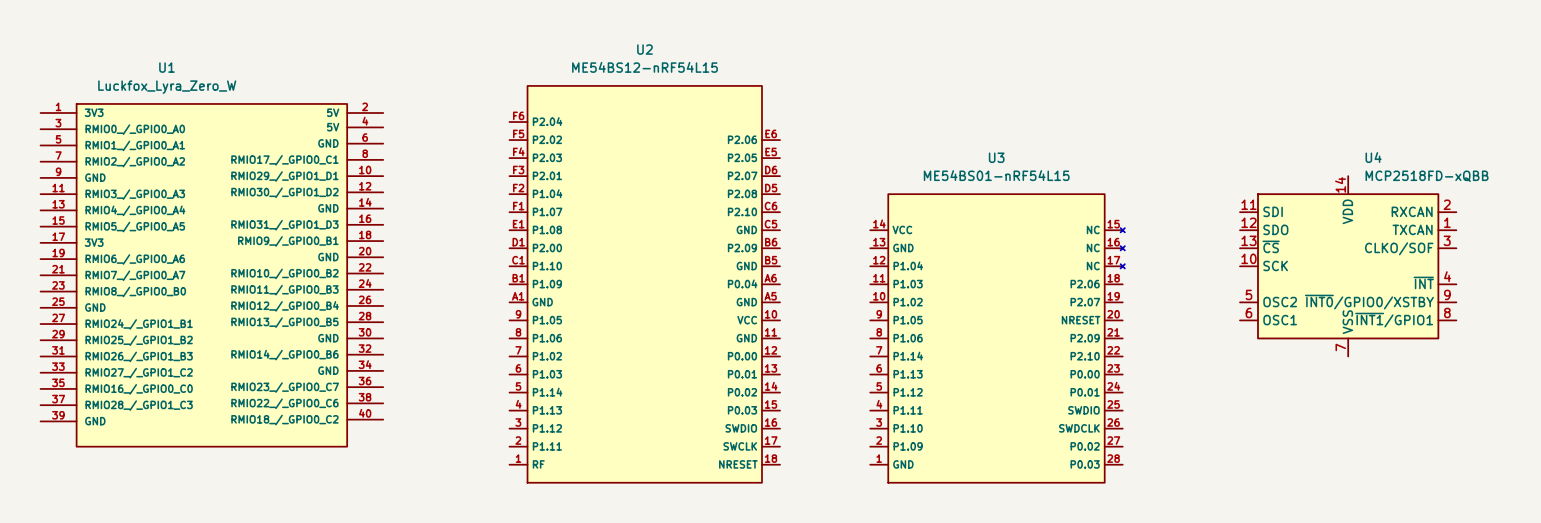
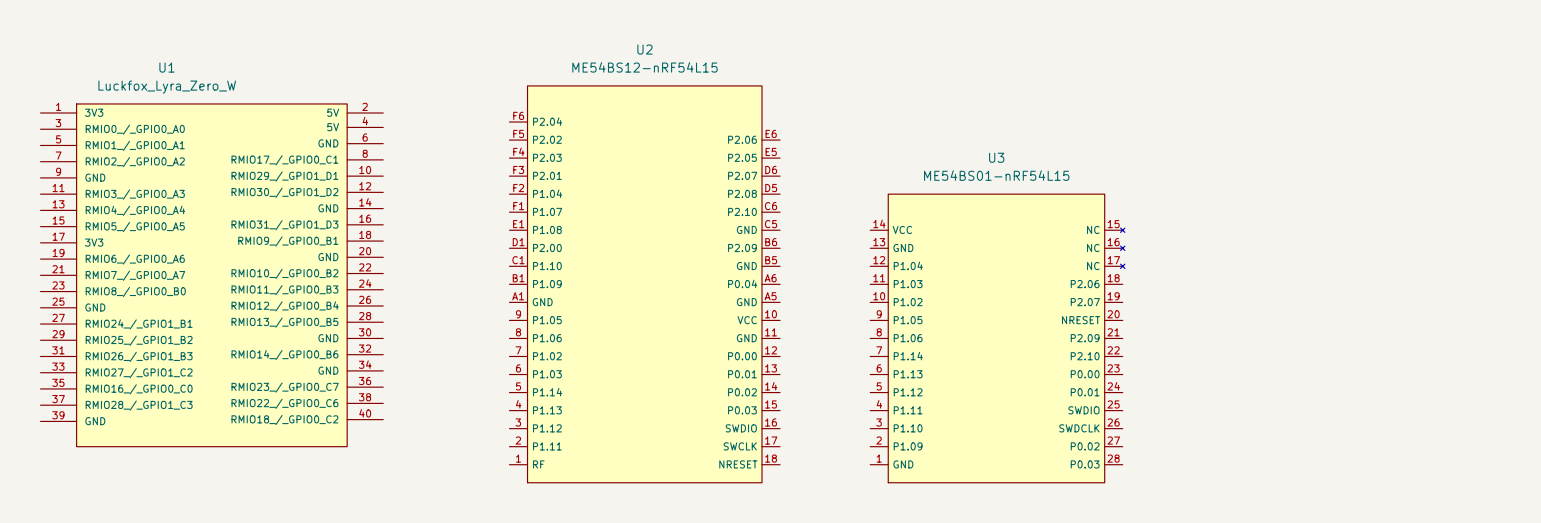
U4: MCP2518FD-xQBB (1348, 266) -> none

